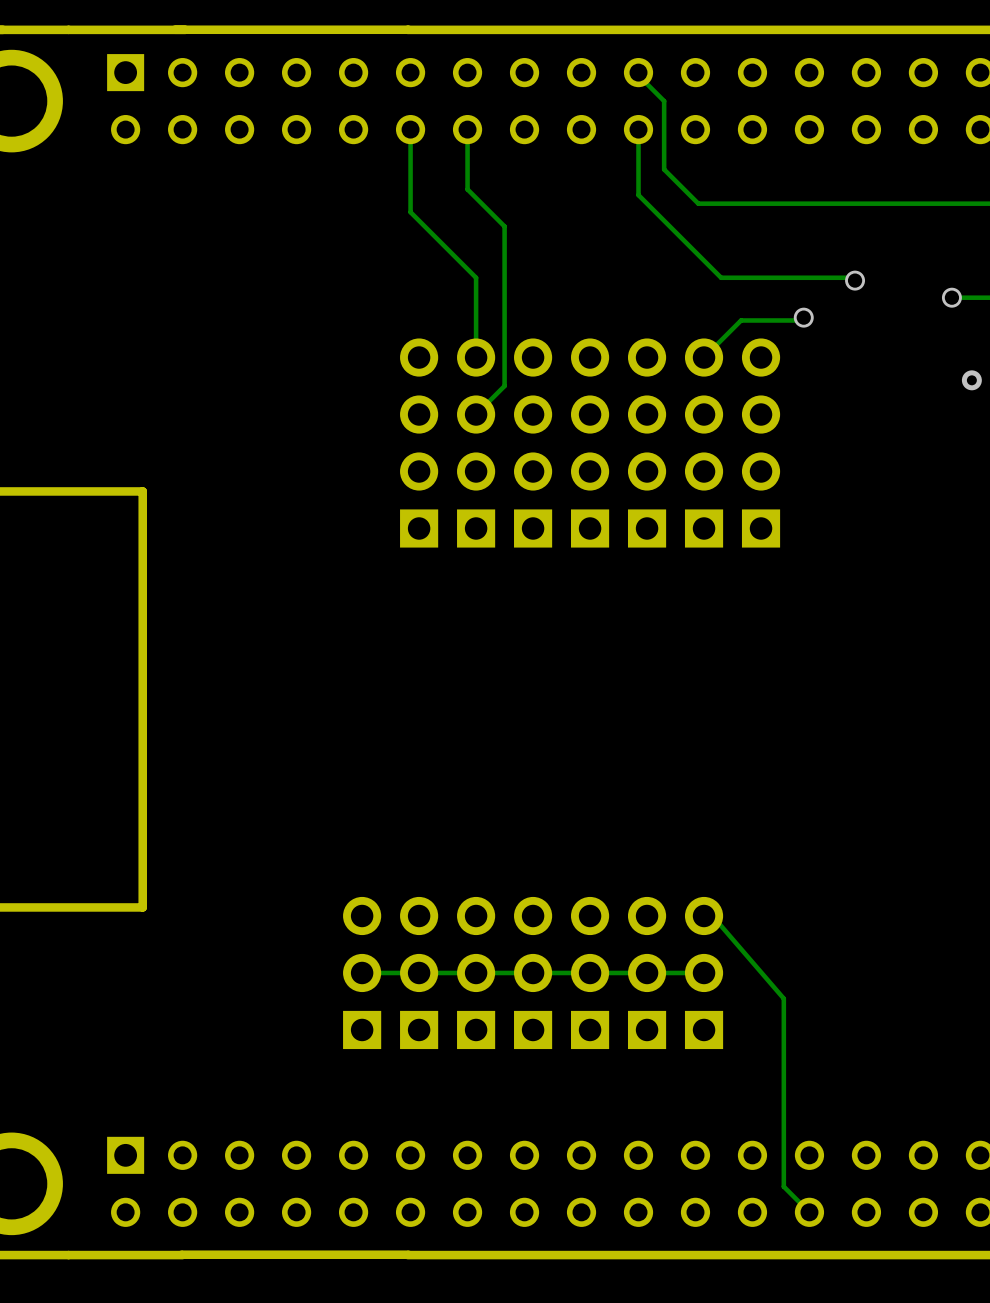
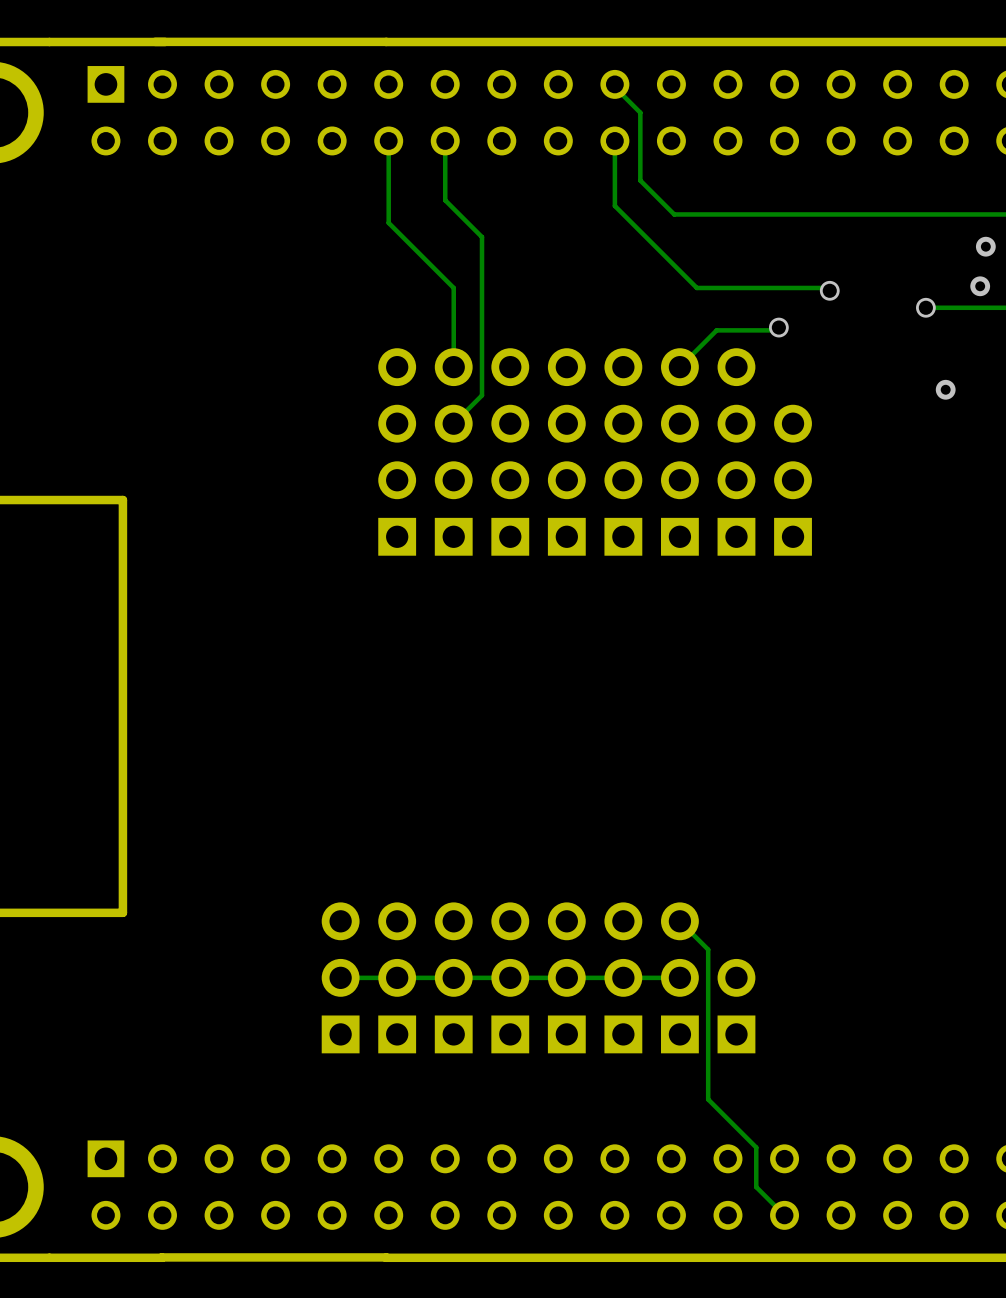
part: none -> (793, 480)
track: (704, 916) (712, 916) (783, 998) (783, 1186) -> (679, 921) (708, 949) (708, 1099) (756, 1147) (756, 1187) (759, 1189)
part: none -> (736, 1006)

